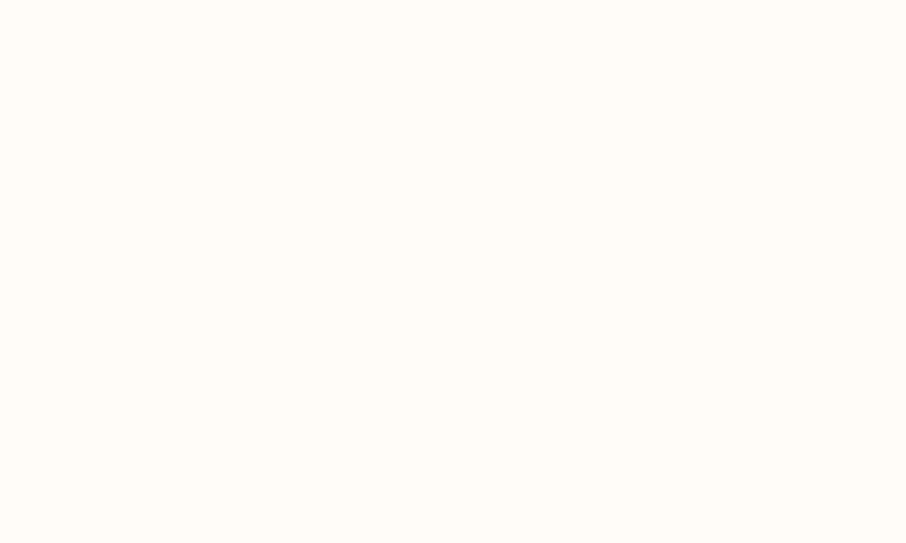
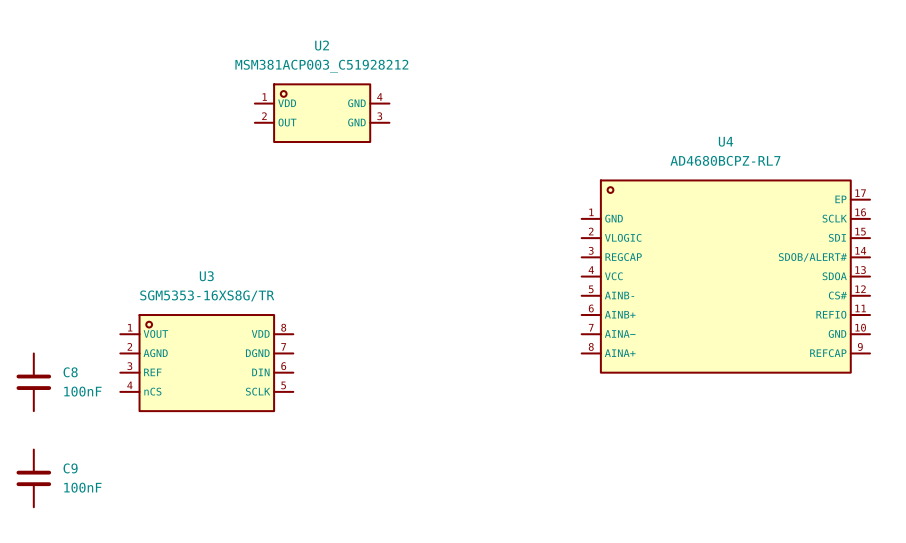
U2: none -> MSM381ACP003_C51928212 (322, 113)
U4: none -> AD4680BCPZ-RL7 (725, 276)
U3: none -> SGM5353-16XS8G/TR (206, 363)
C8: none -> 100nF (33, 382)
C9: none -> 100nF (33, 478)

